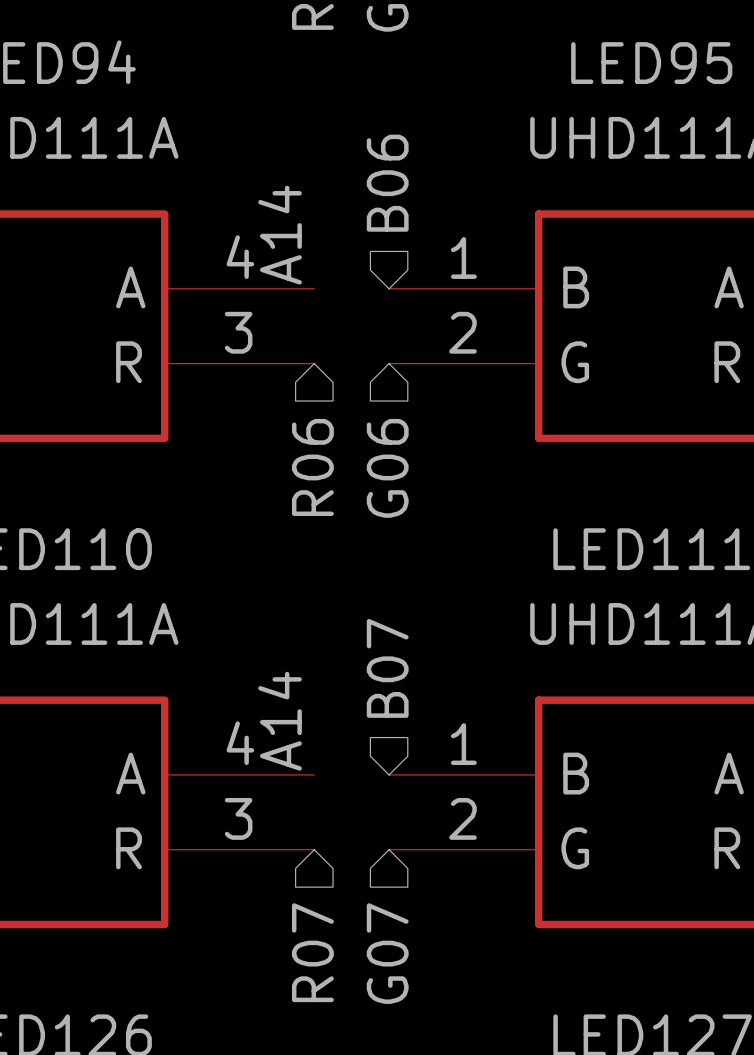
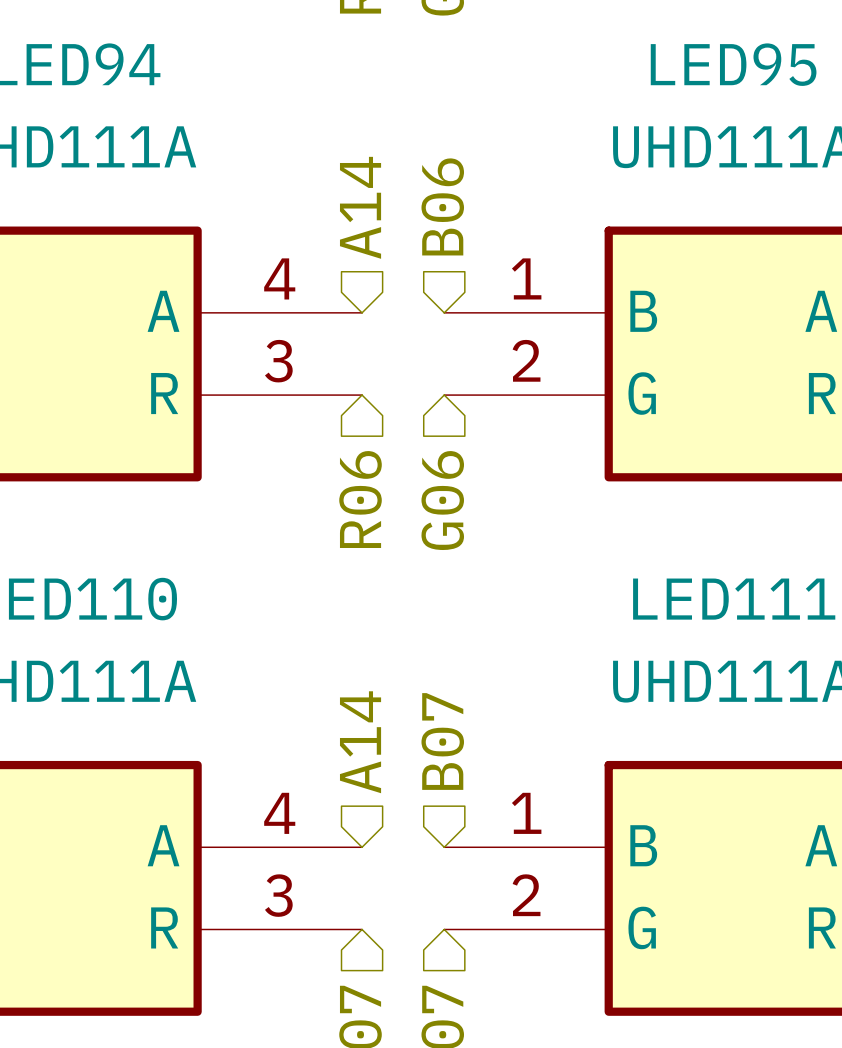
hierarchical label: none -> A14 (360, 207)
label: A14 (280, 235) -> none
hierarchical label: none -> A14 (360, 742)
label: A14 (280, 721) -> none

